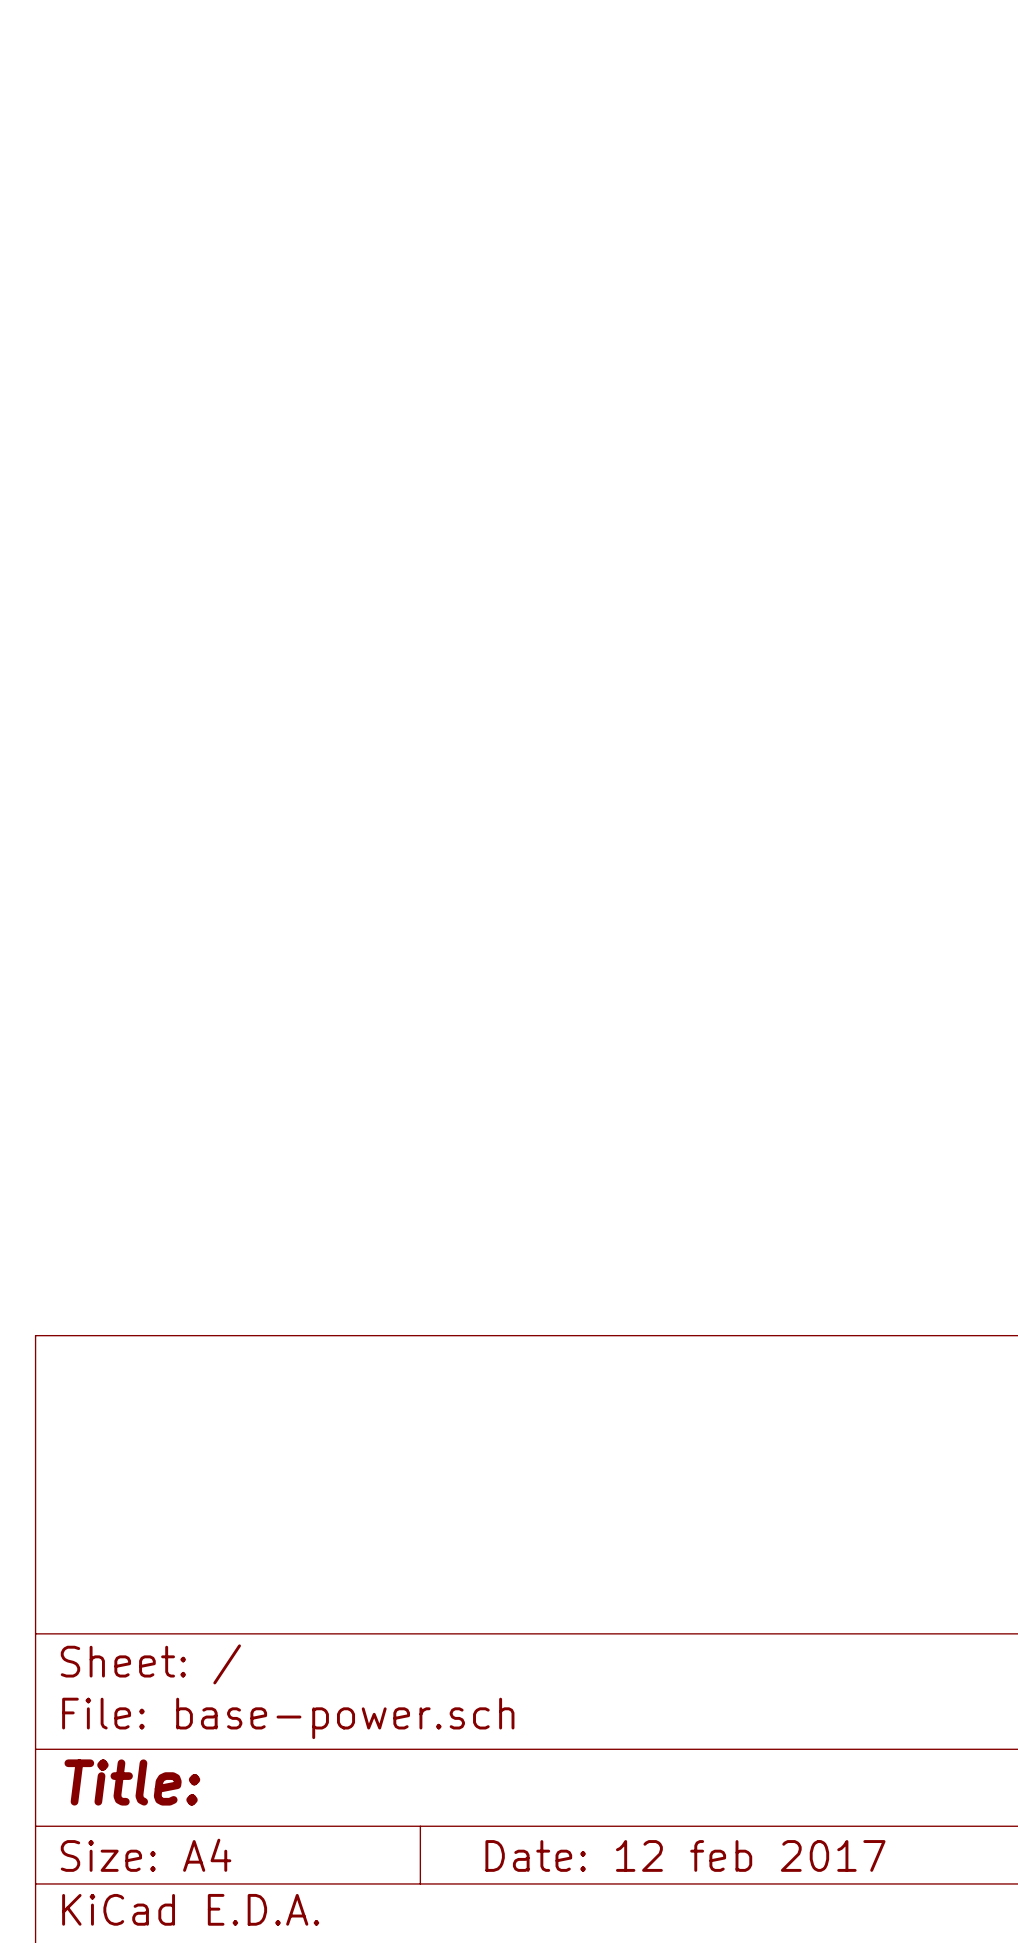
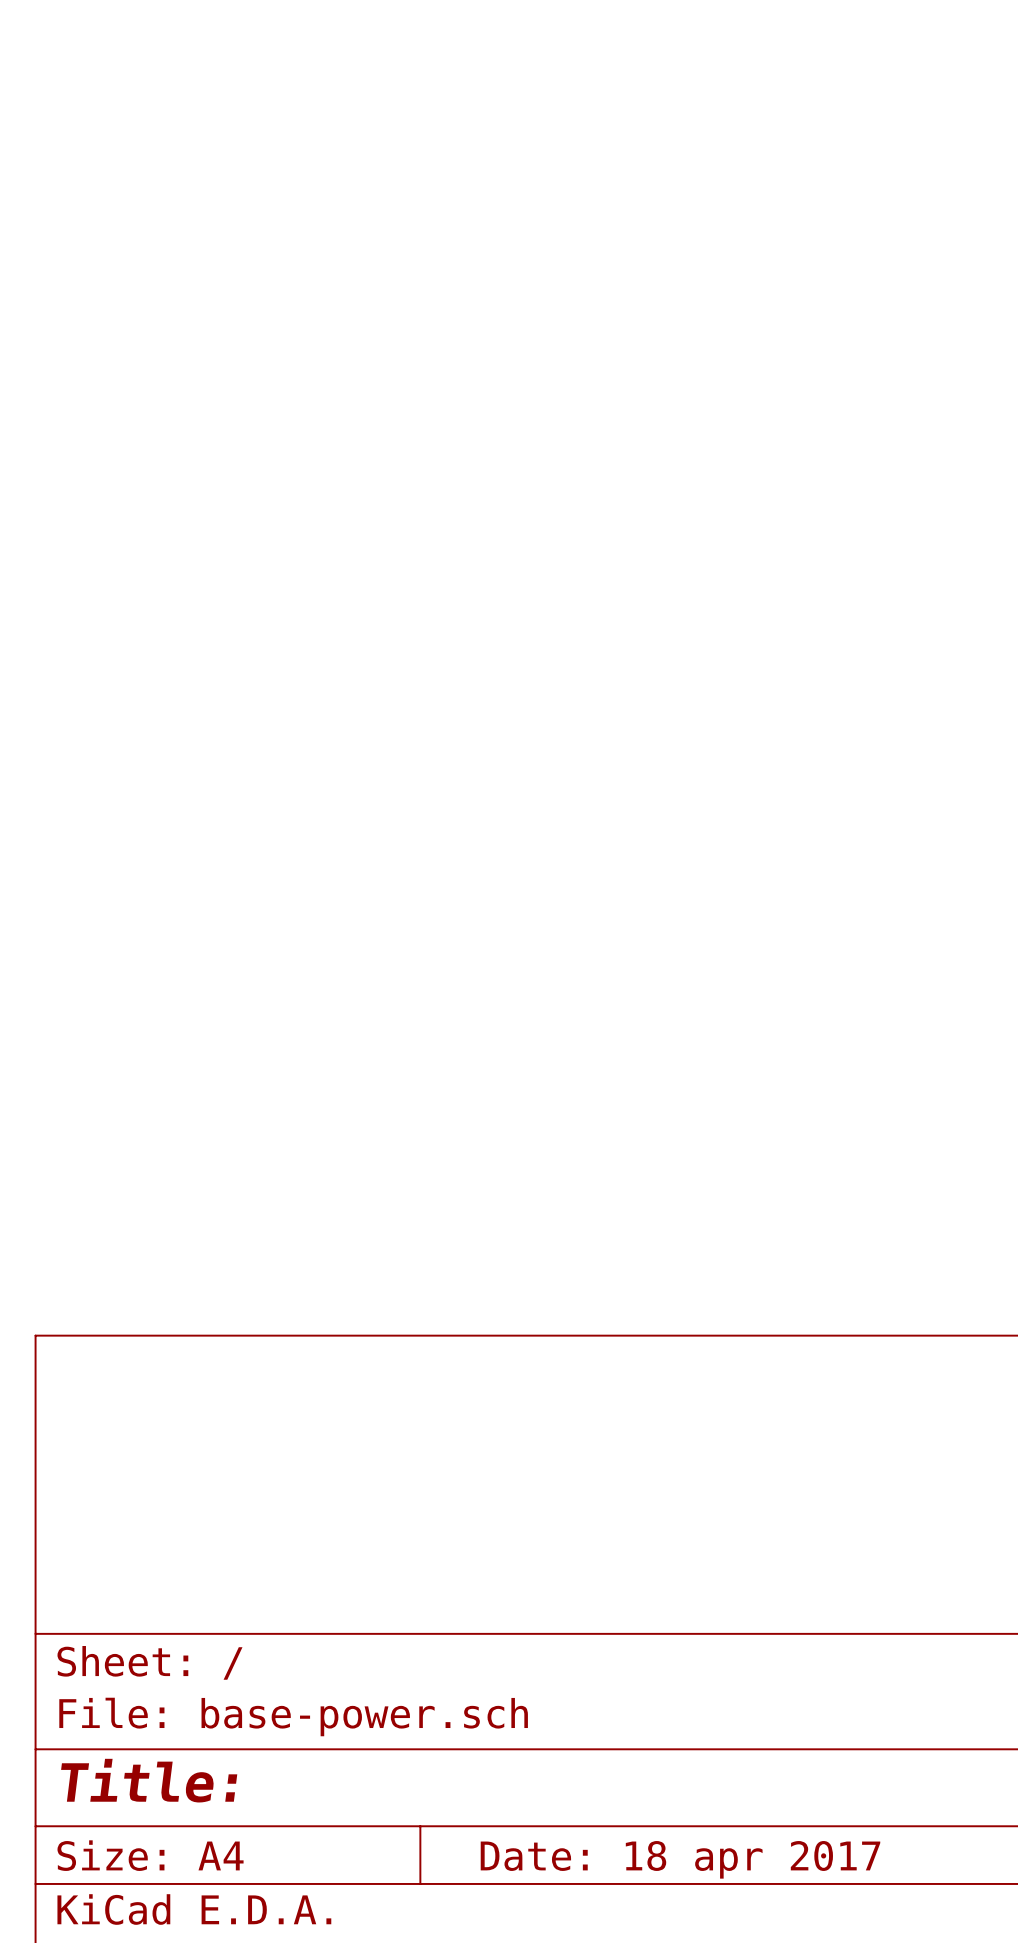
title block: Date: 12 feb 2017 (685, 1855) -> Date: 18 apr 2017 (680, 1859)

